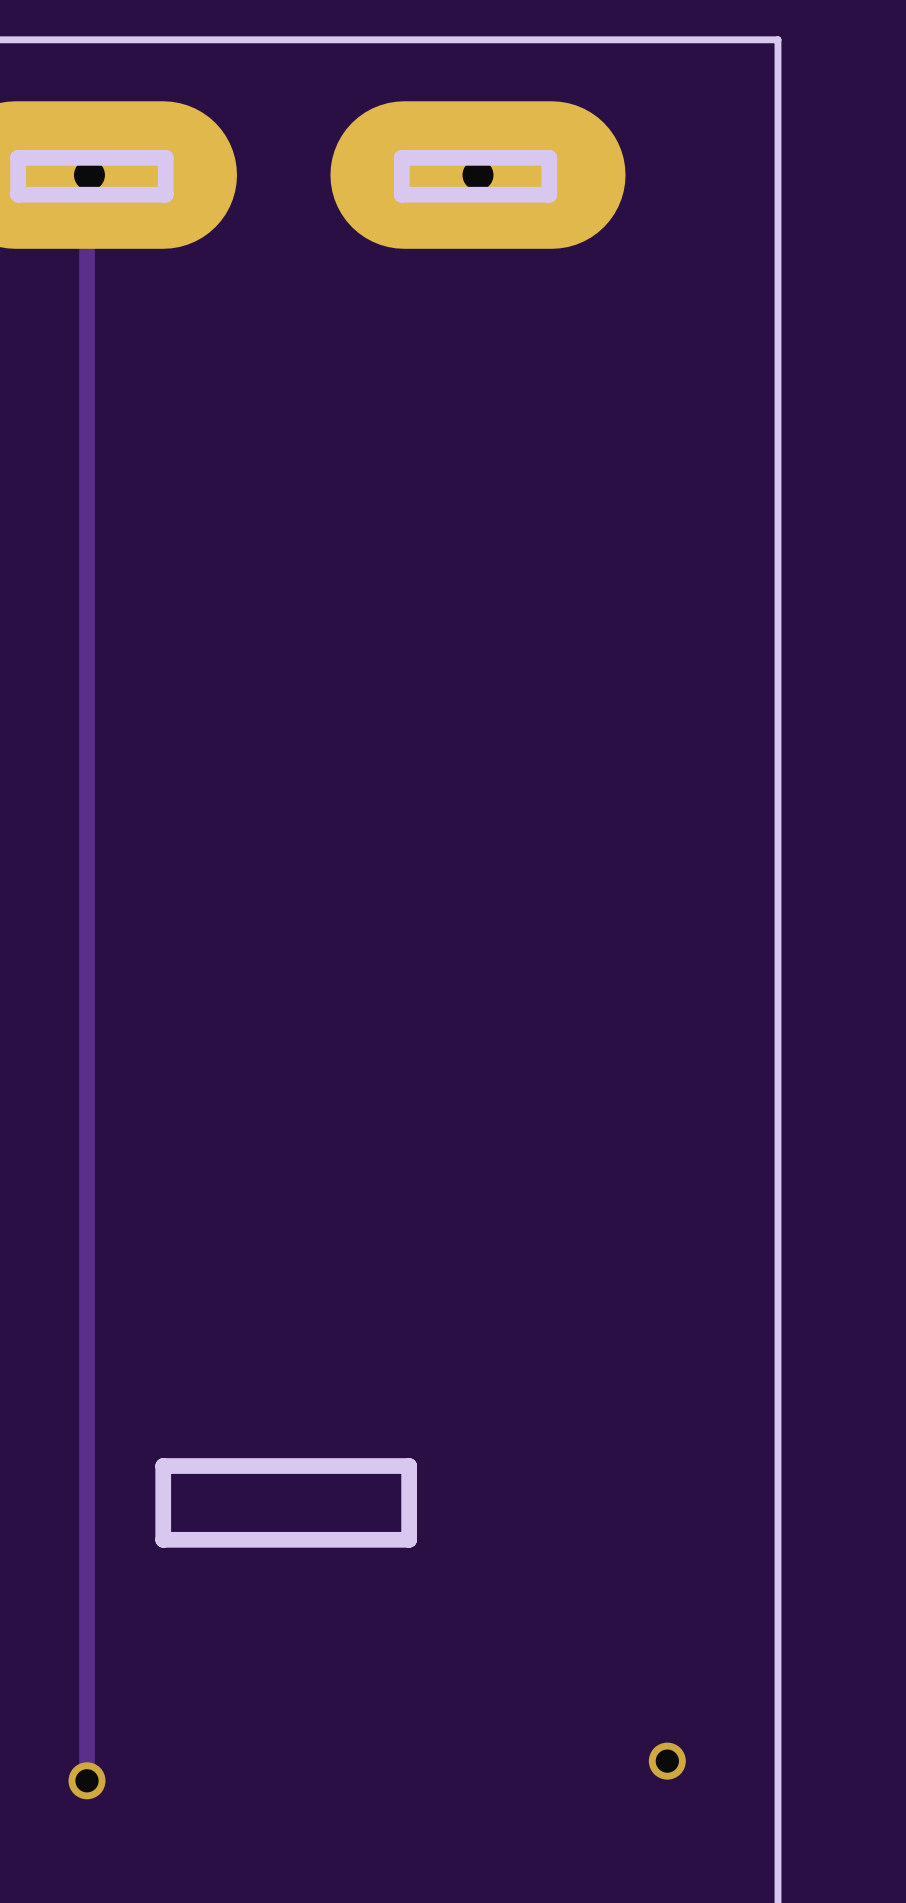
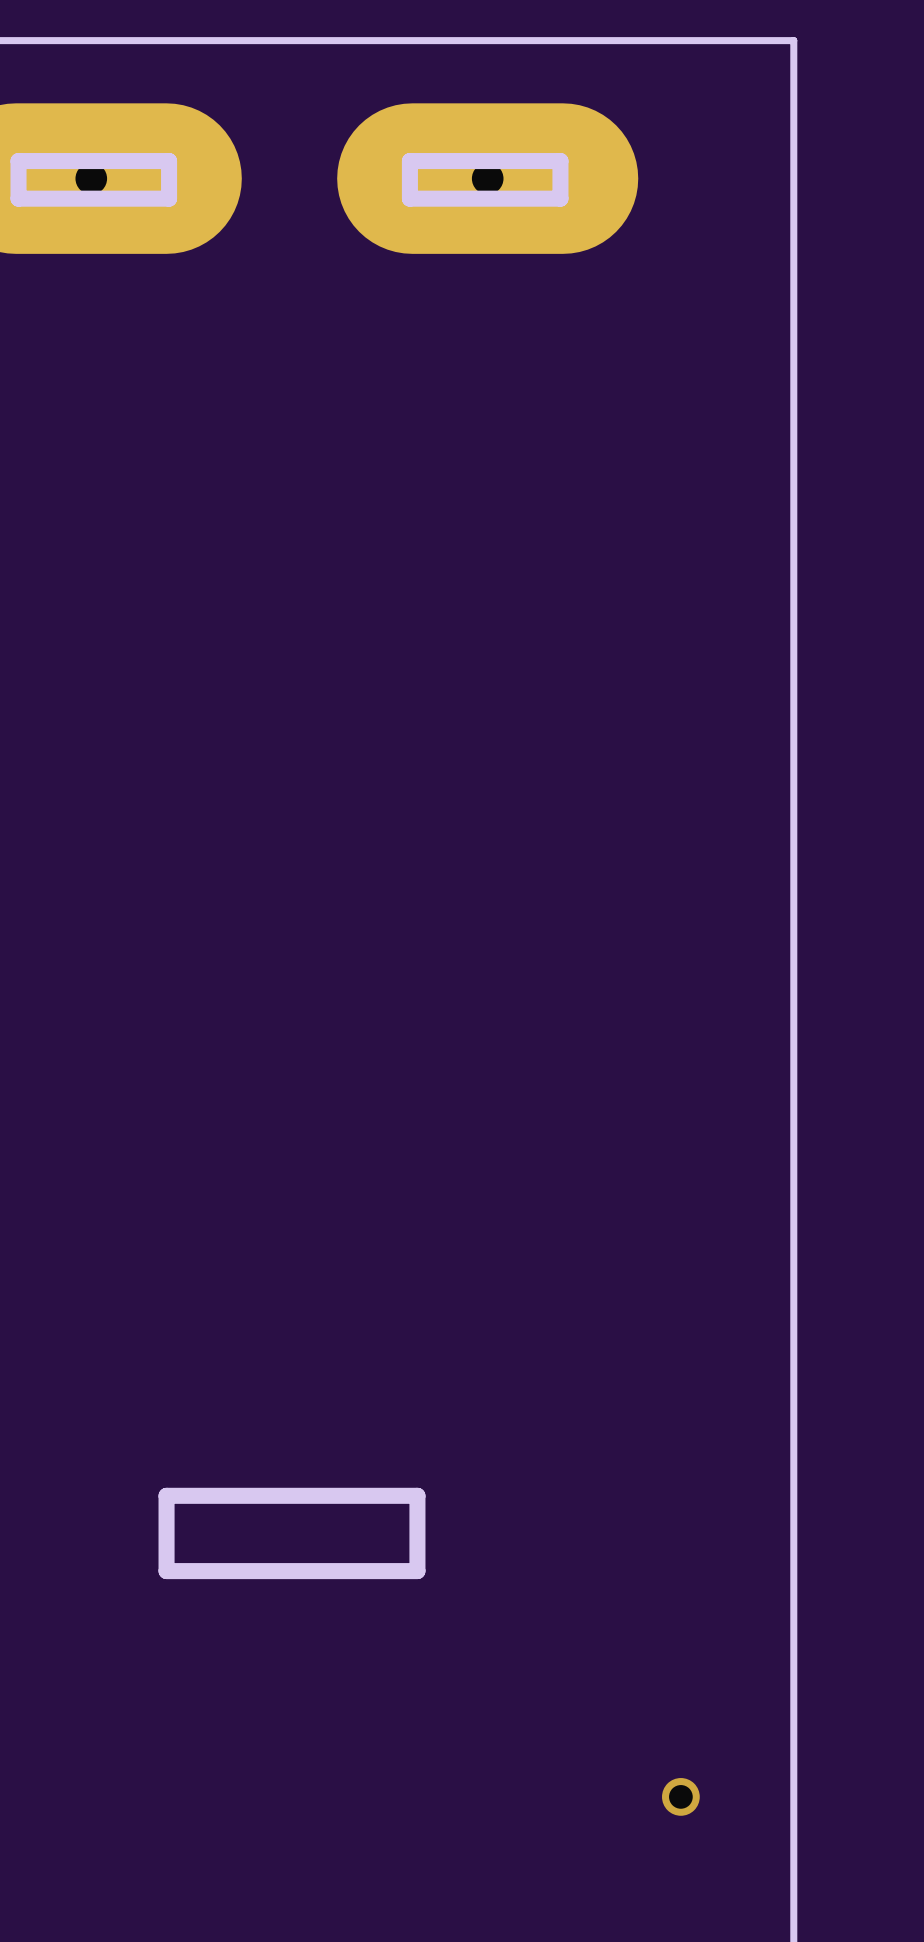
track: (89, 175) (87, 204) (87, 1780) -> none
via: (87, 1780) -> none

